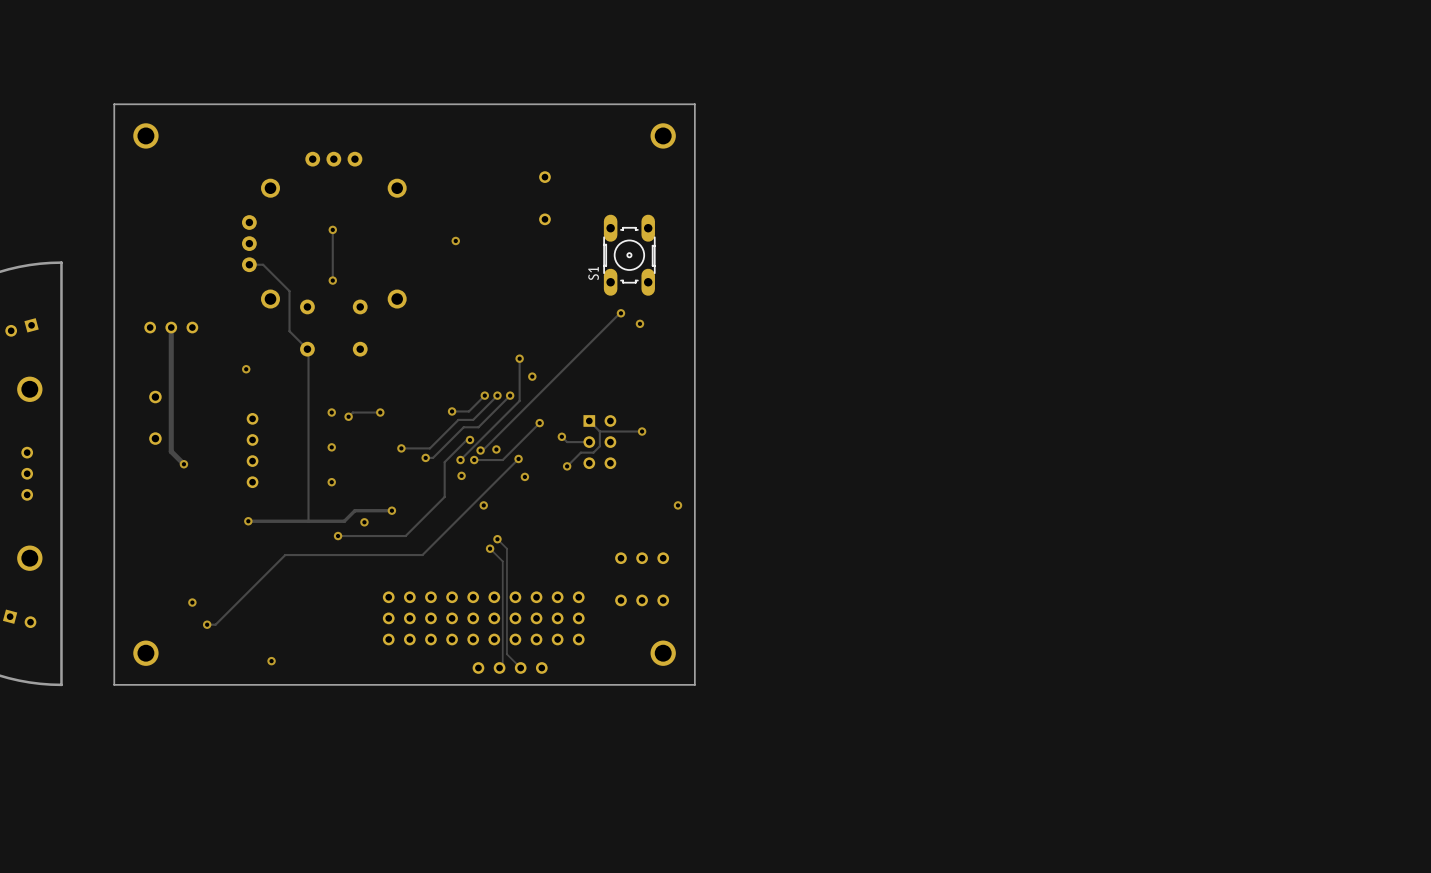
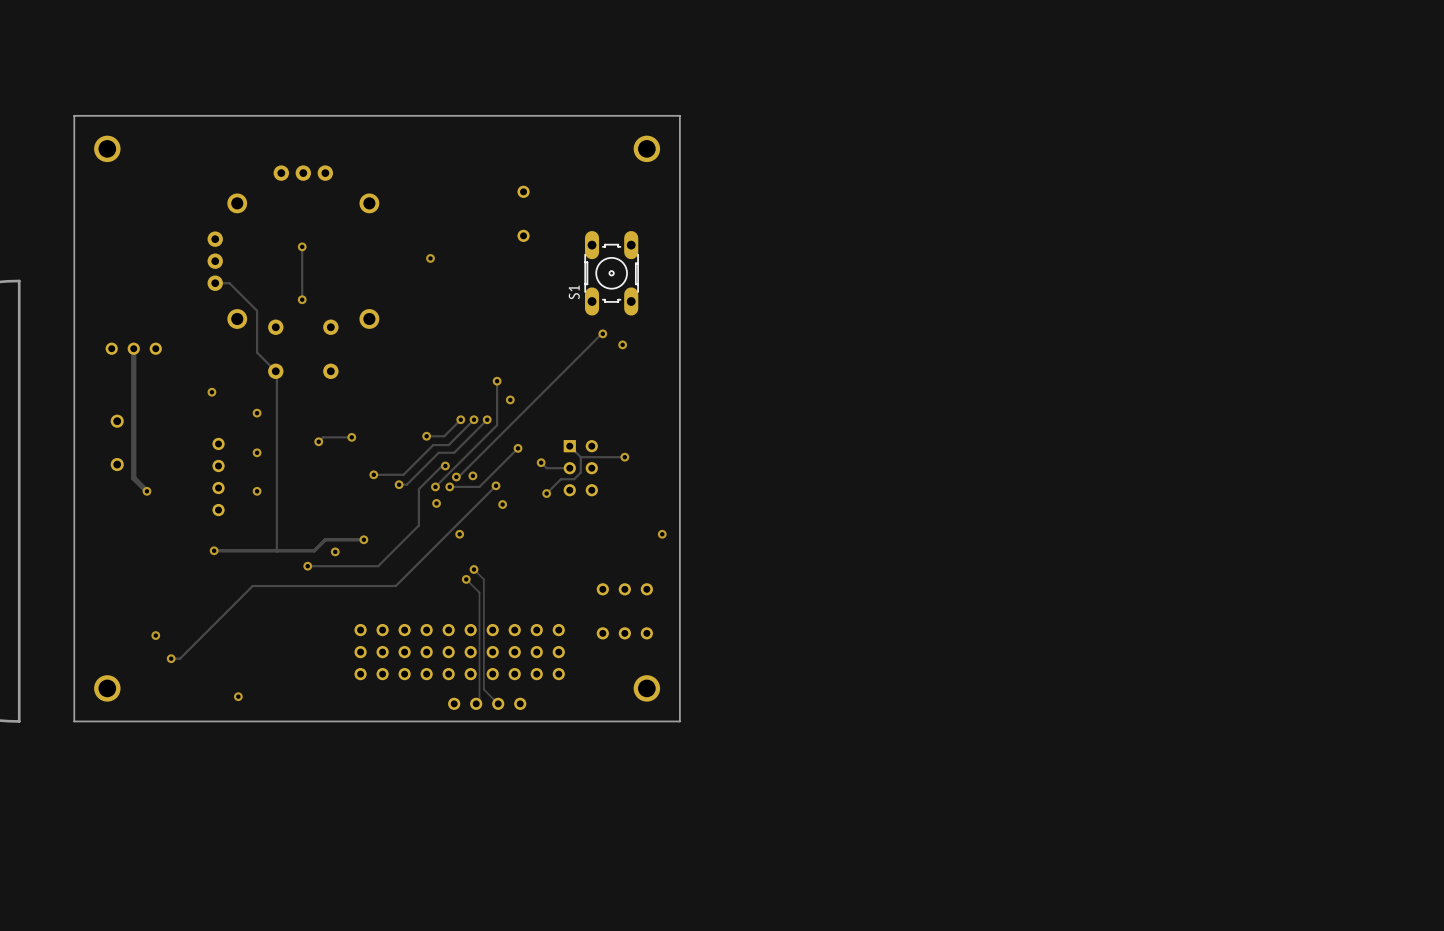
via: none -> (257, 413)
via: (331, 412) -> none
via: none -> (257, 452)
via: (331, 447) -> none
via: none -> (257, 491)
via: (331, 482) -> none

